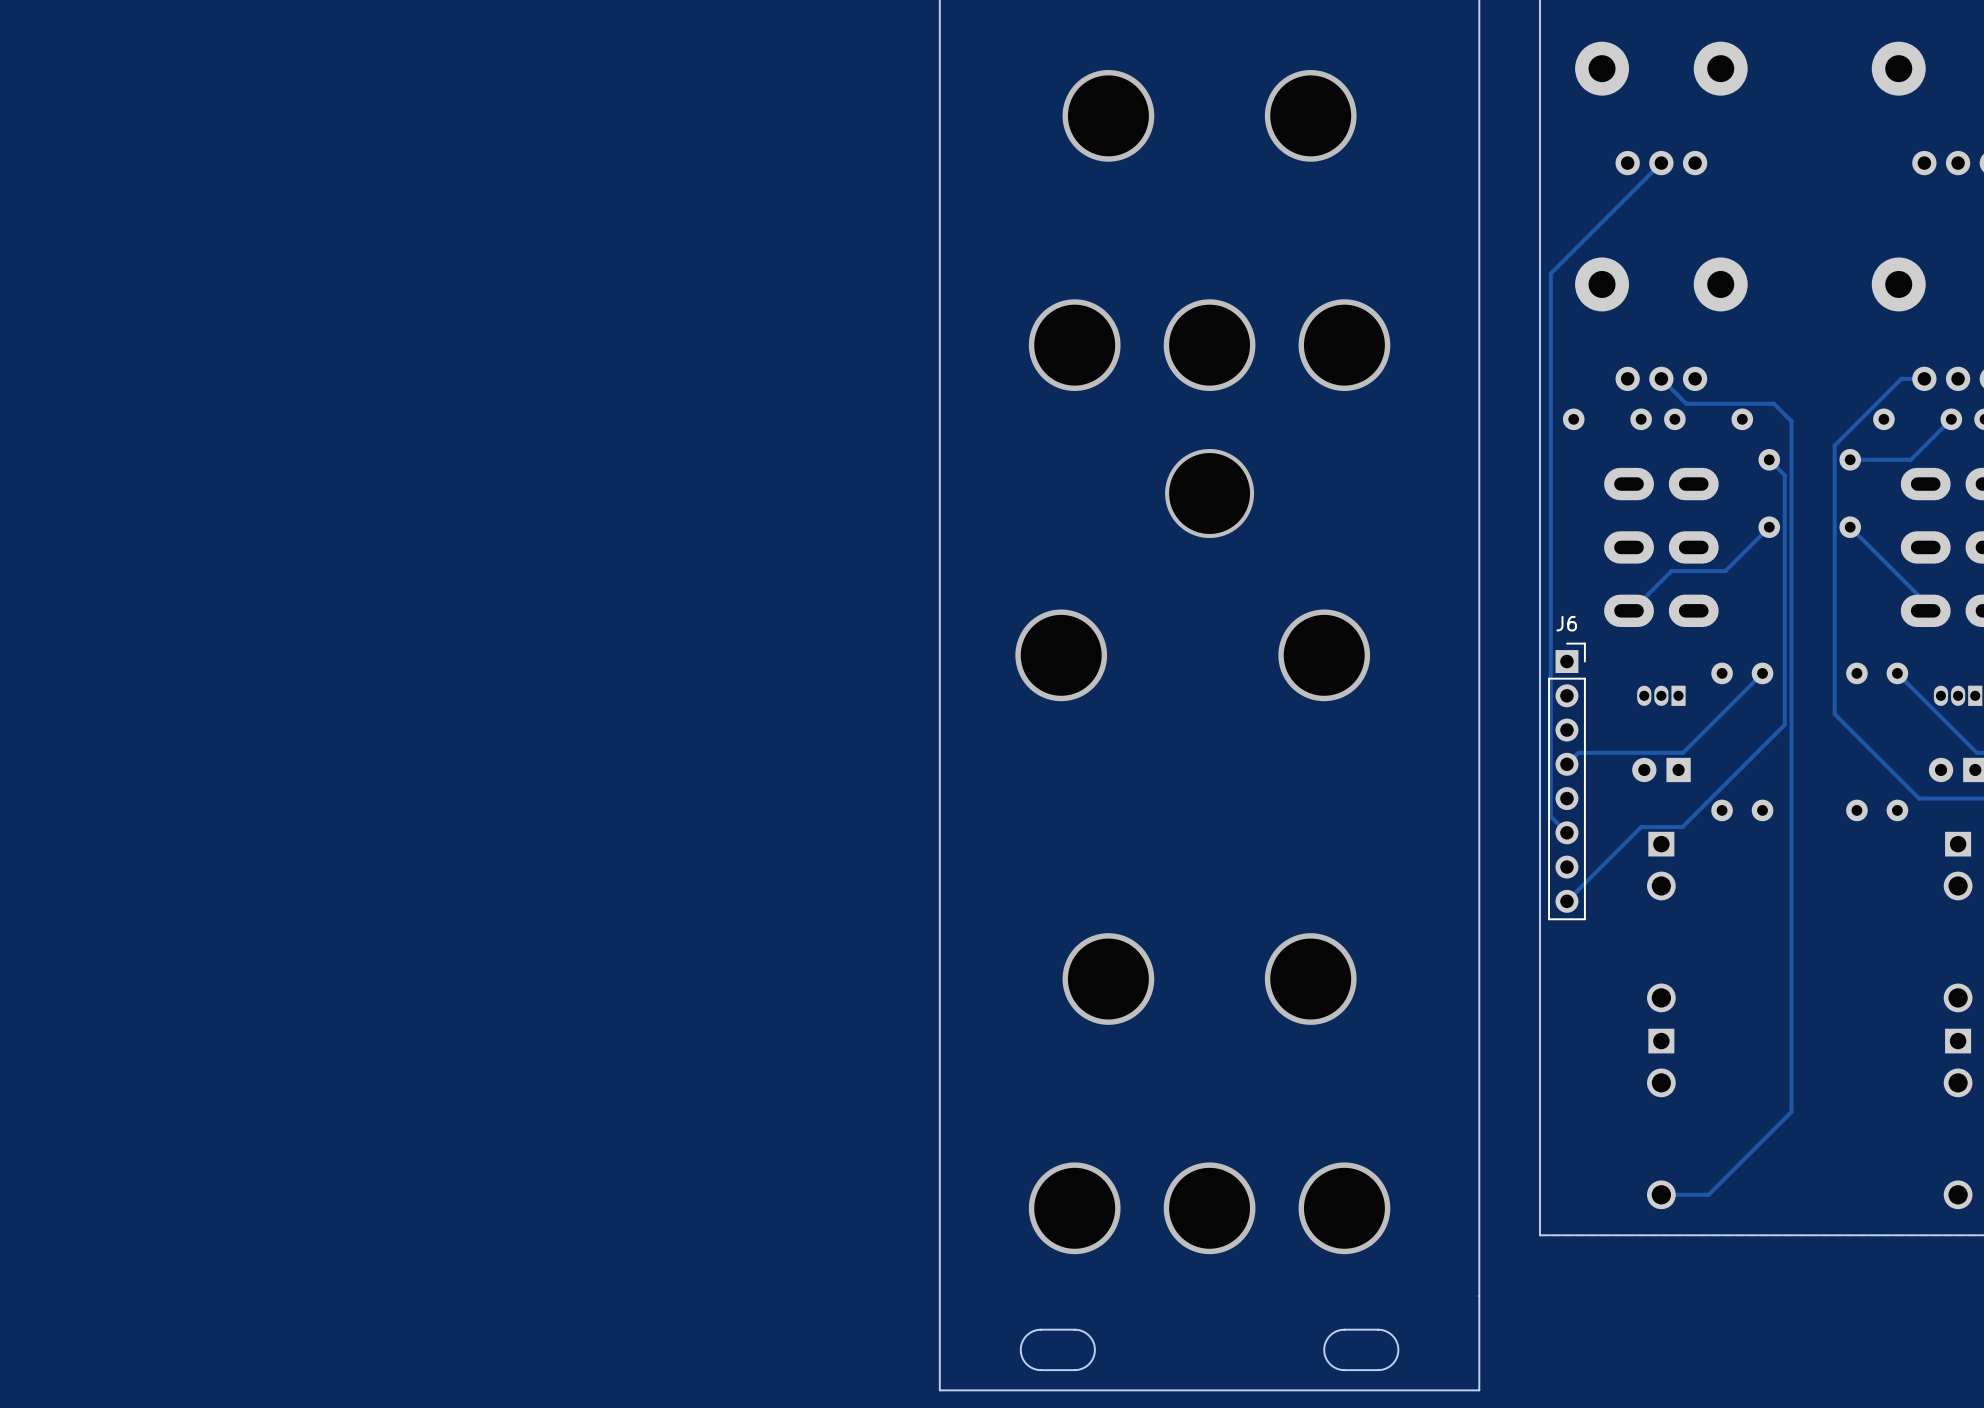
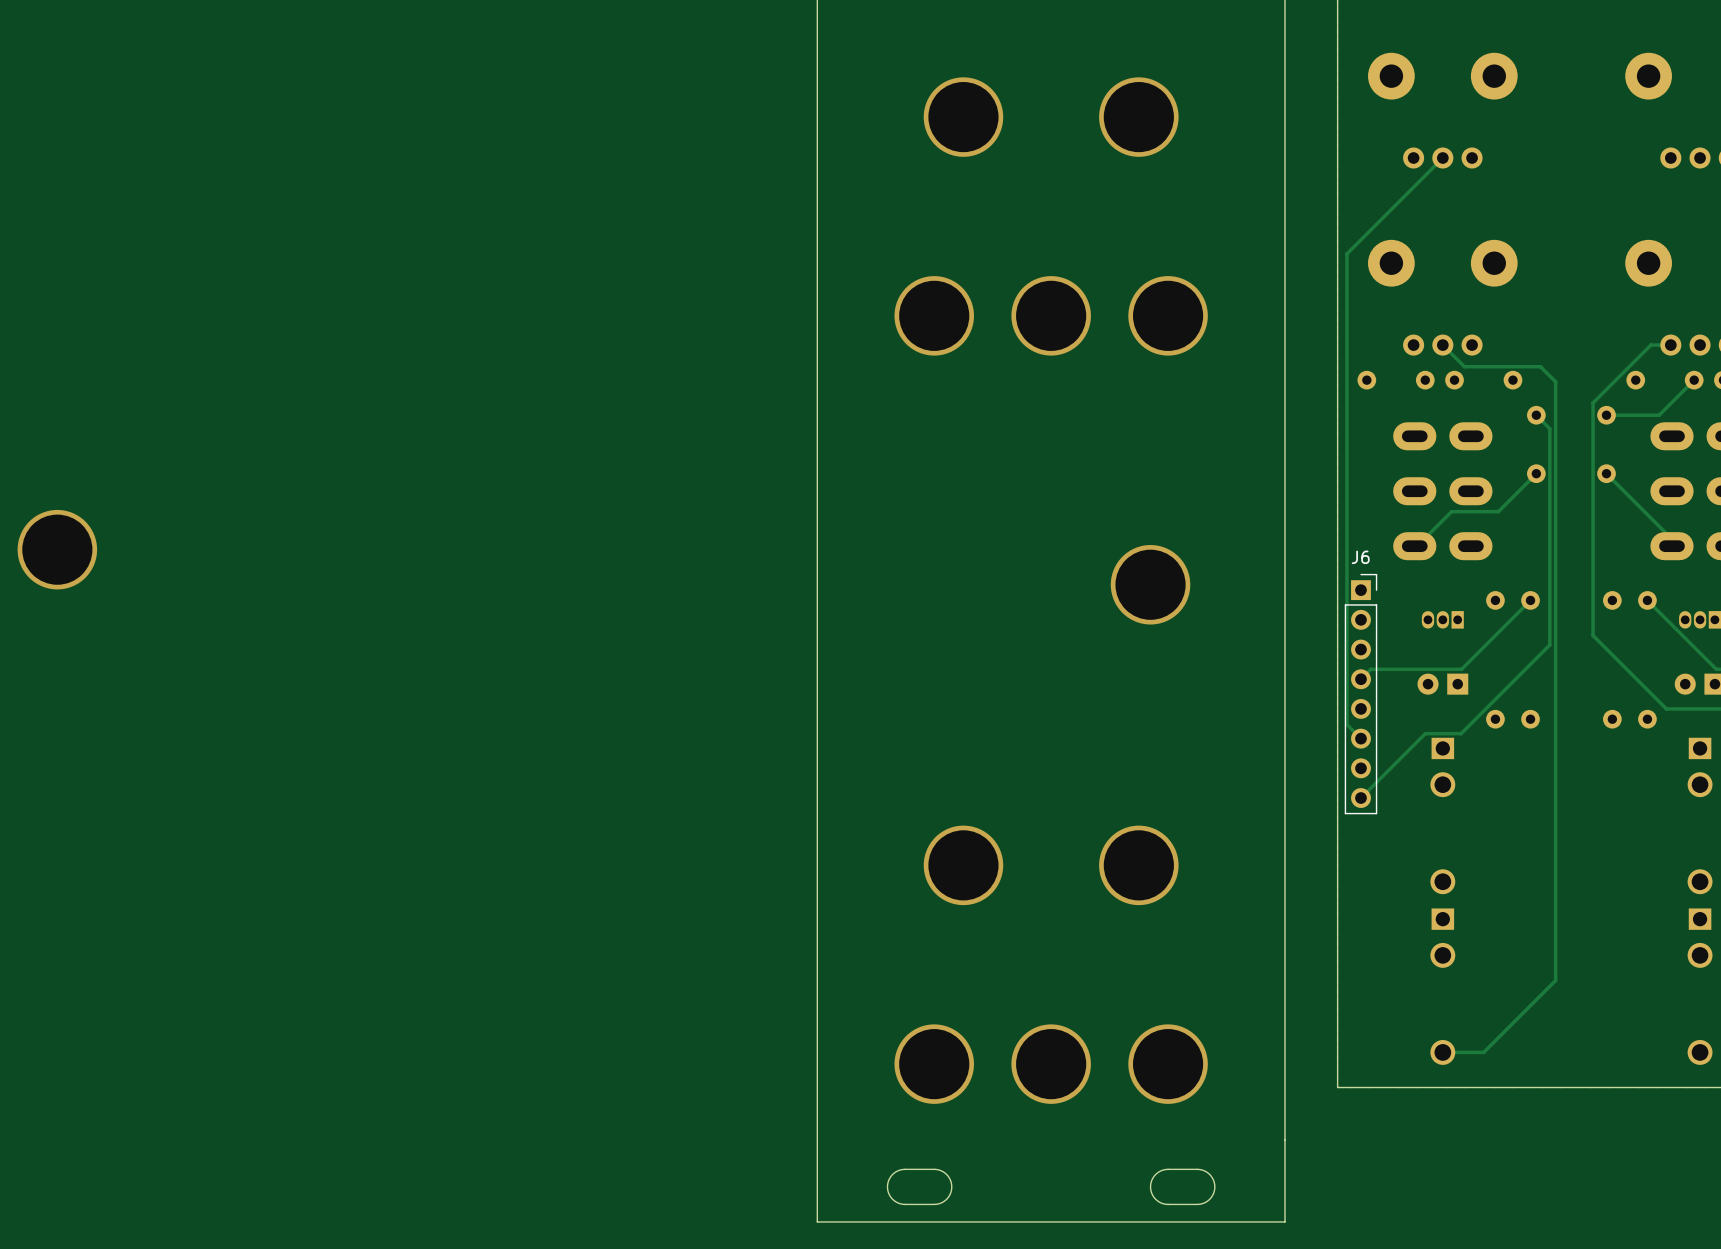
via: (1209, 493) -> none
via: none -> (57, 549)
via: (1061, 655) -> none

